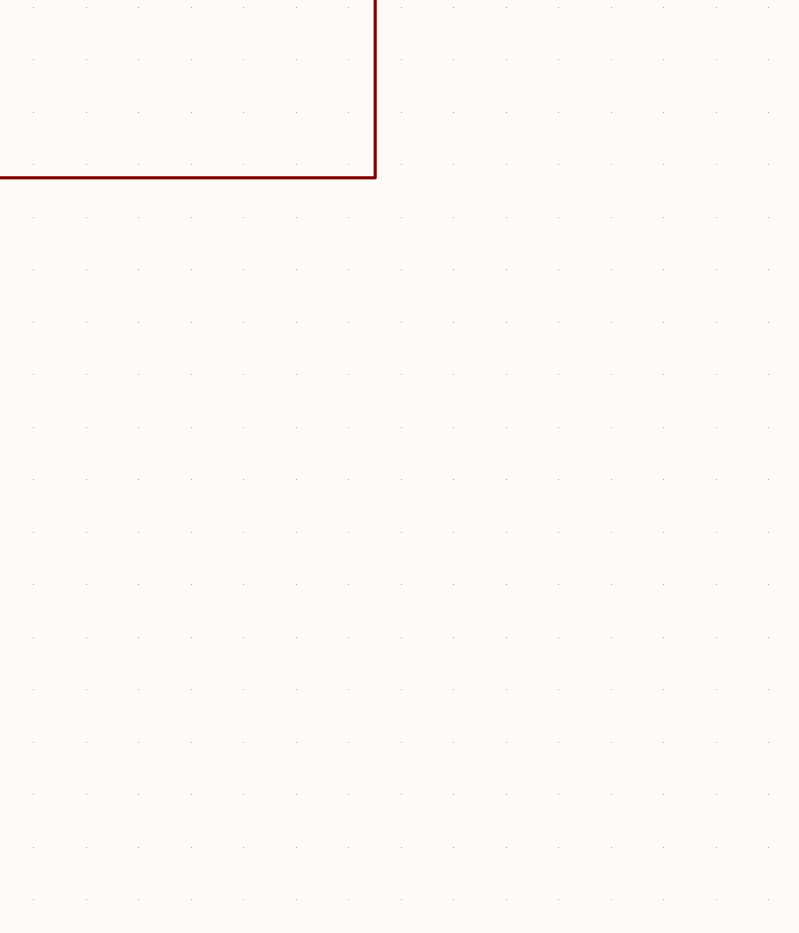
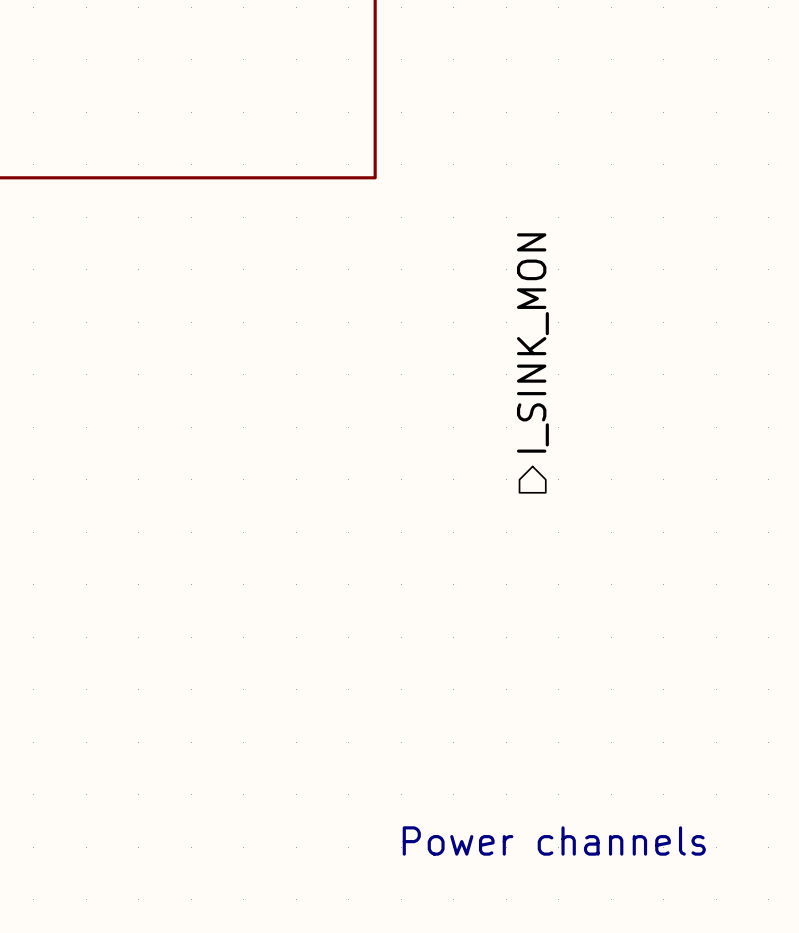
sheet pin: none -> I_SINK_MON (532, 343)
text: none -> Power channels (554, 840)

